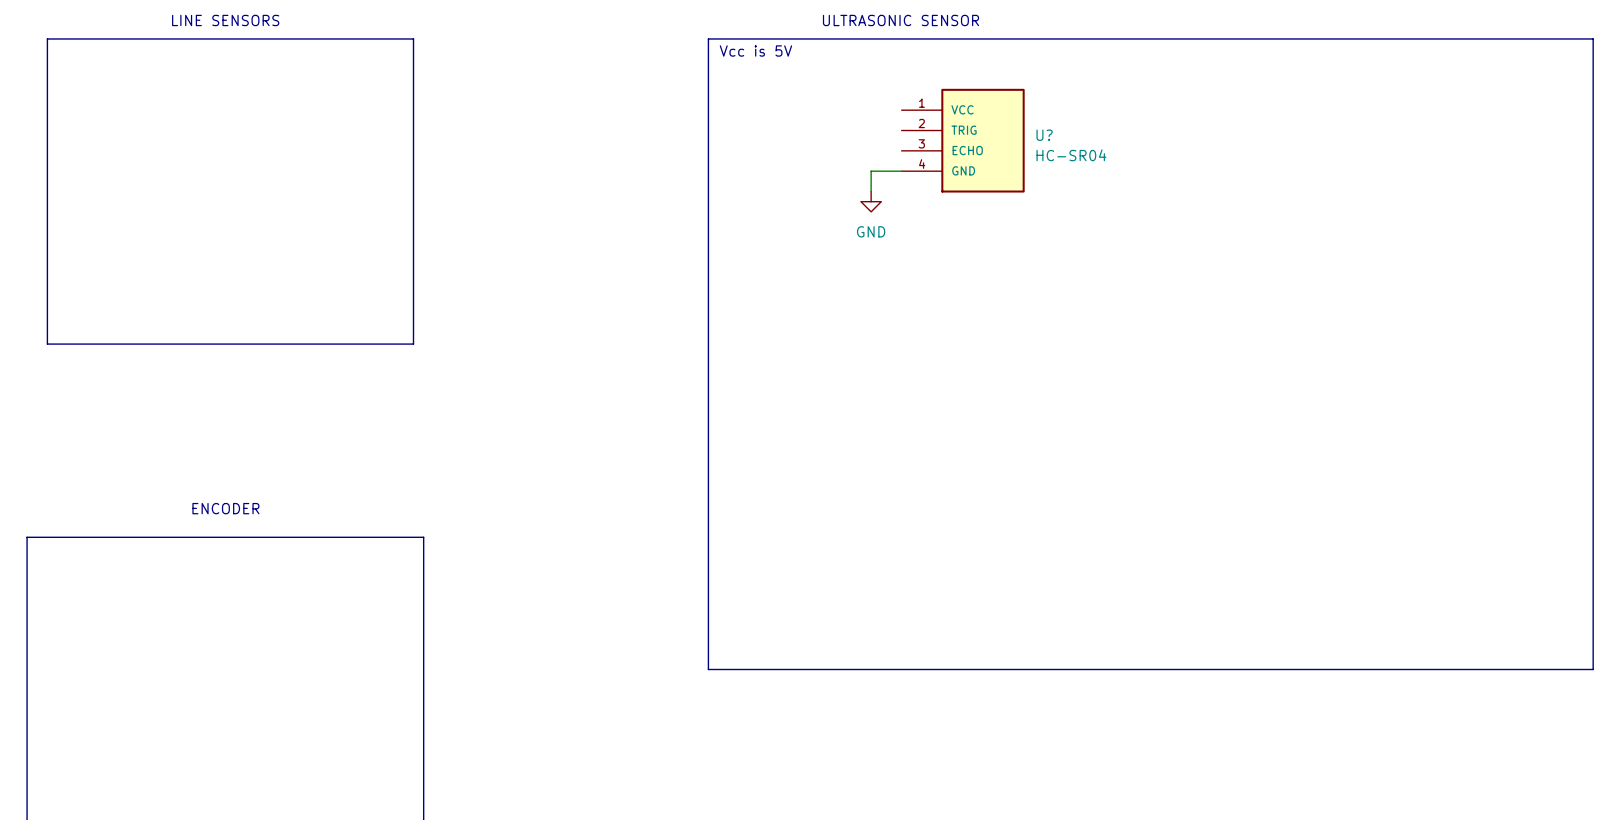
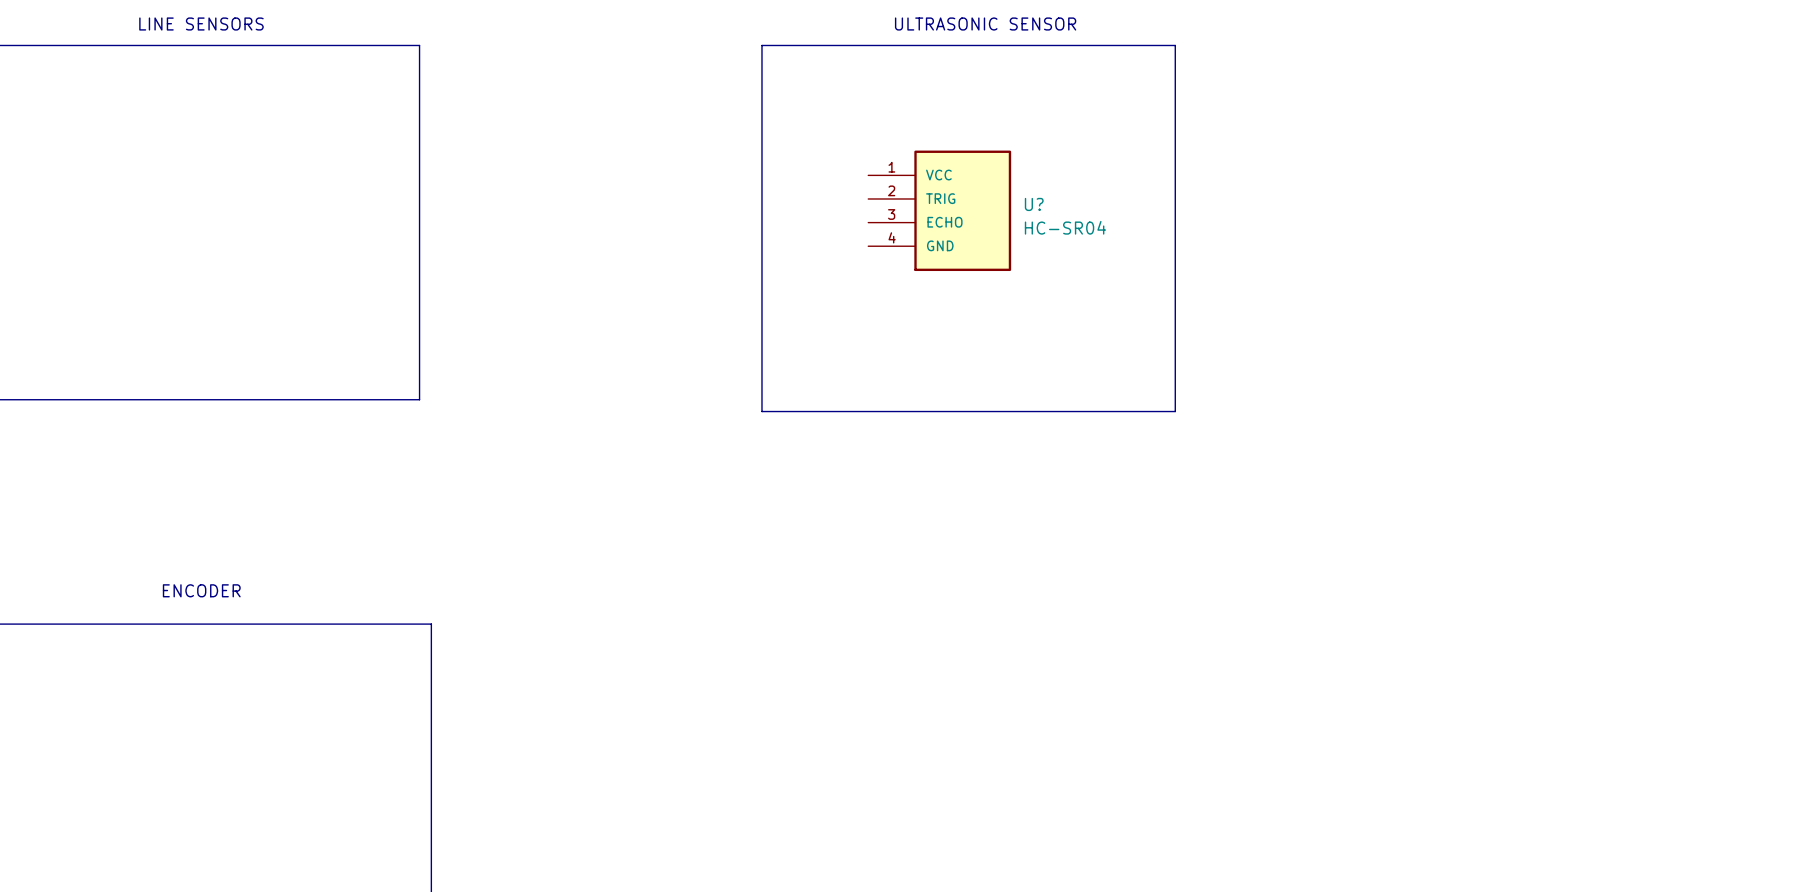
line: (1064, 38) (1593, 38) (1593, 669) (708, 669) (708, 354) -> (1175, 45) (1175, 411) (761, 411)
text: Vcc is 5V (755, 50) -> none
U? position: (963, 140) -> (939, 210)
power symbol: GND (871, 201) -> none

